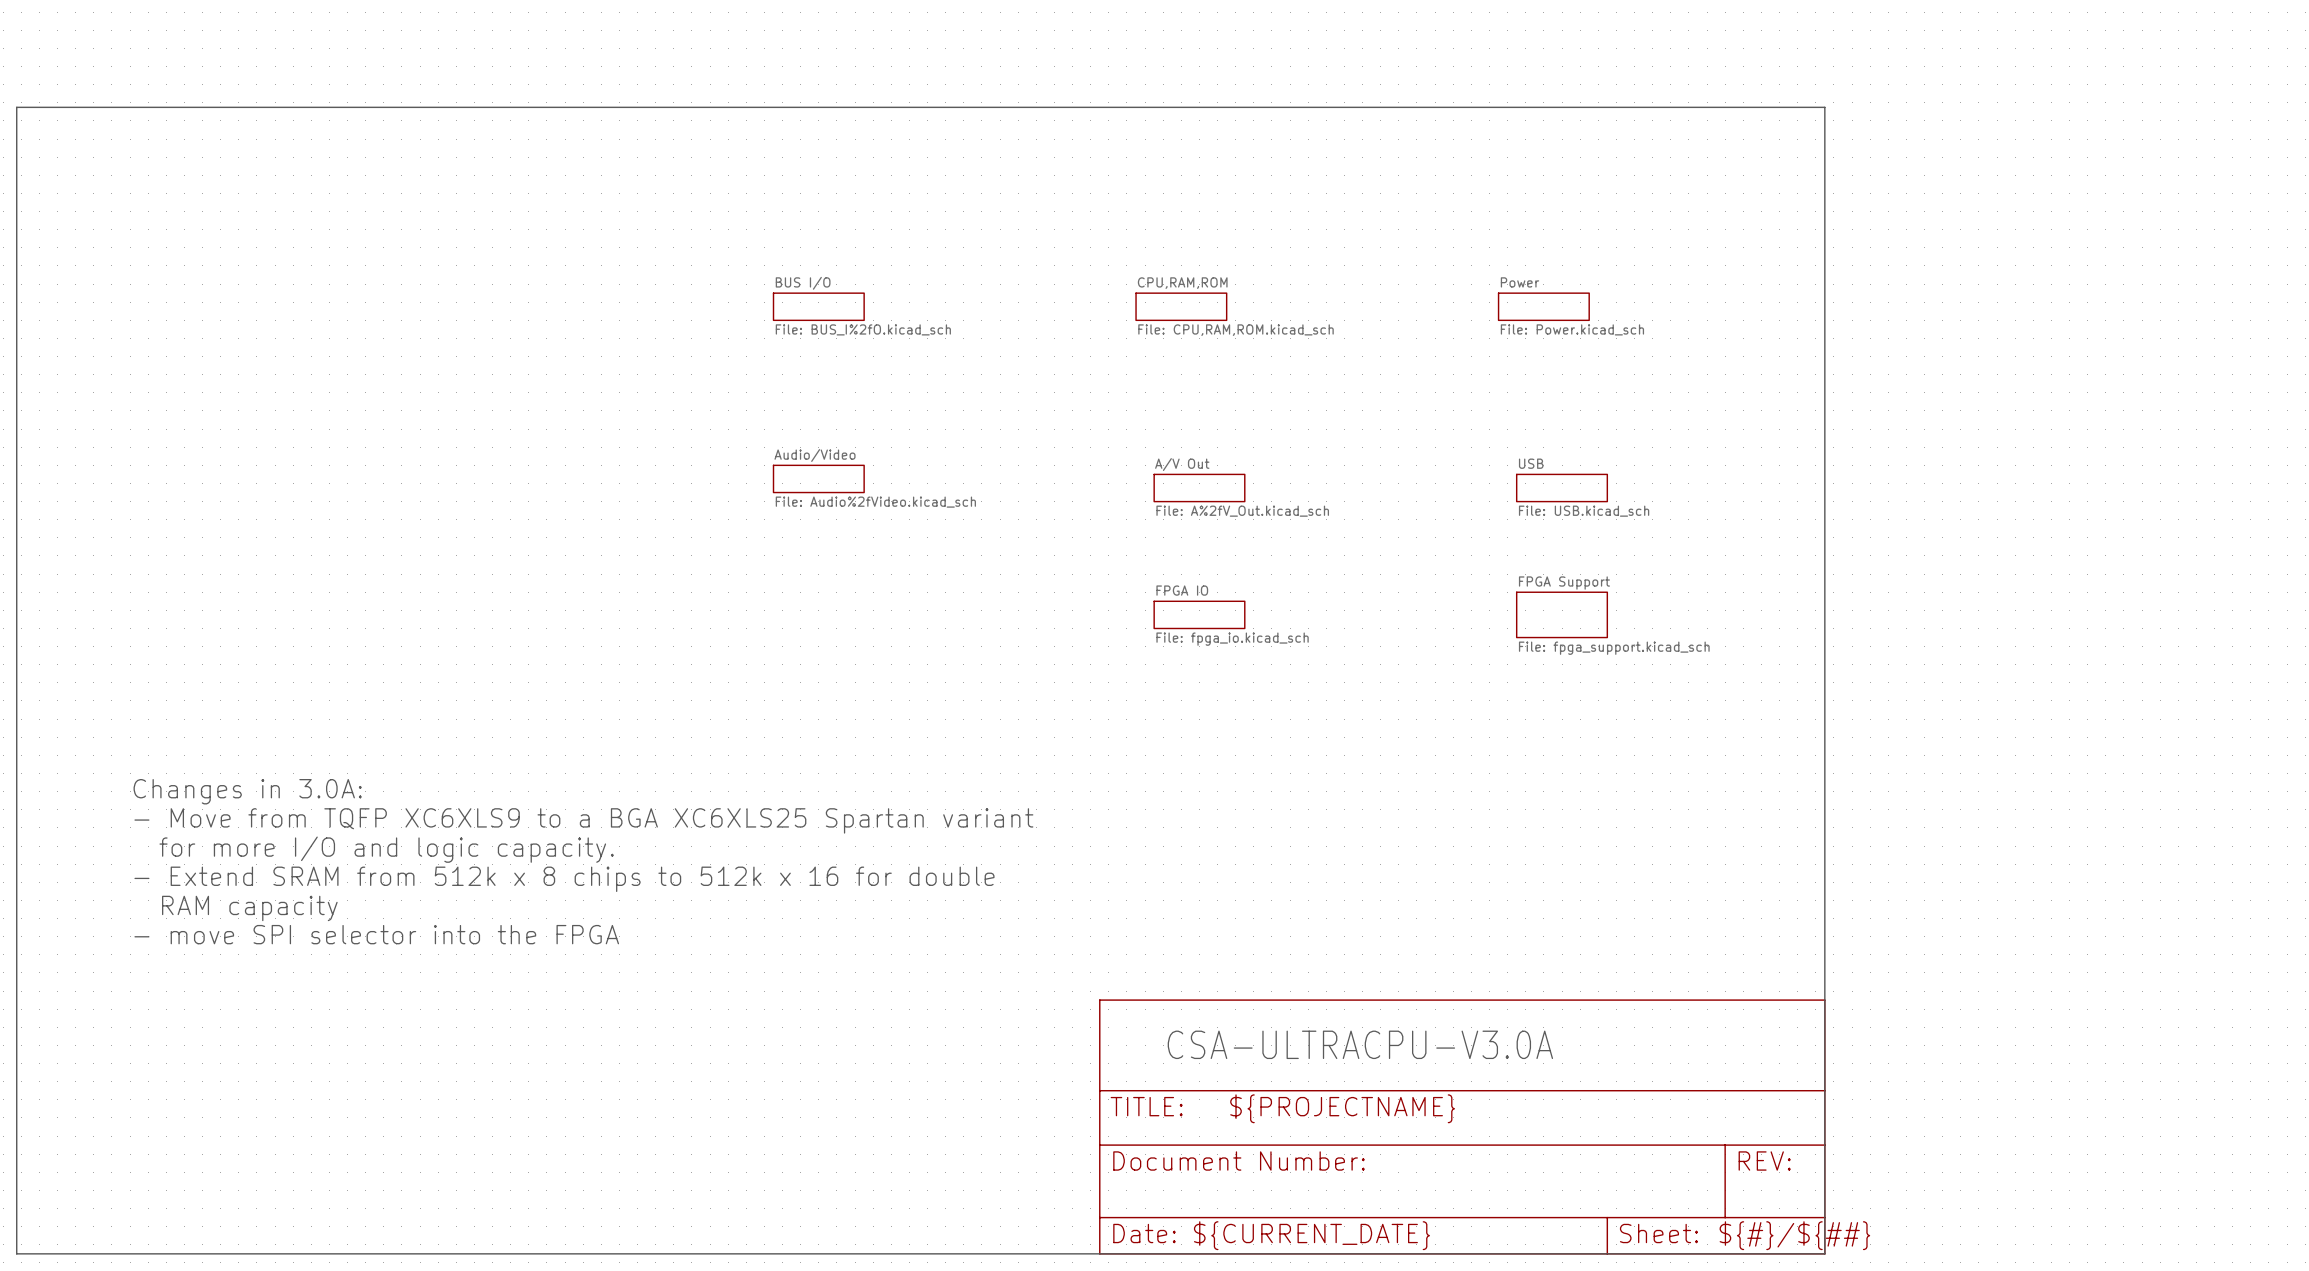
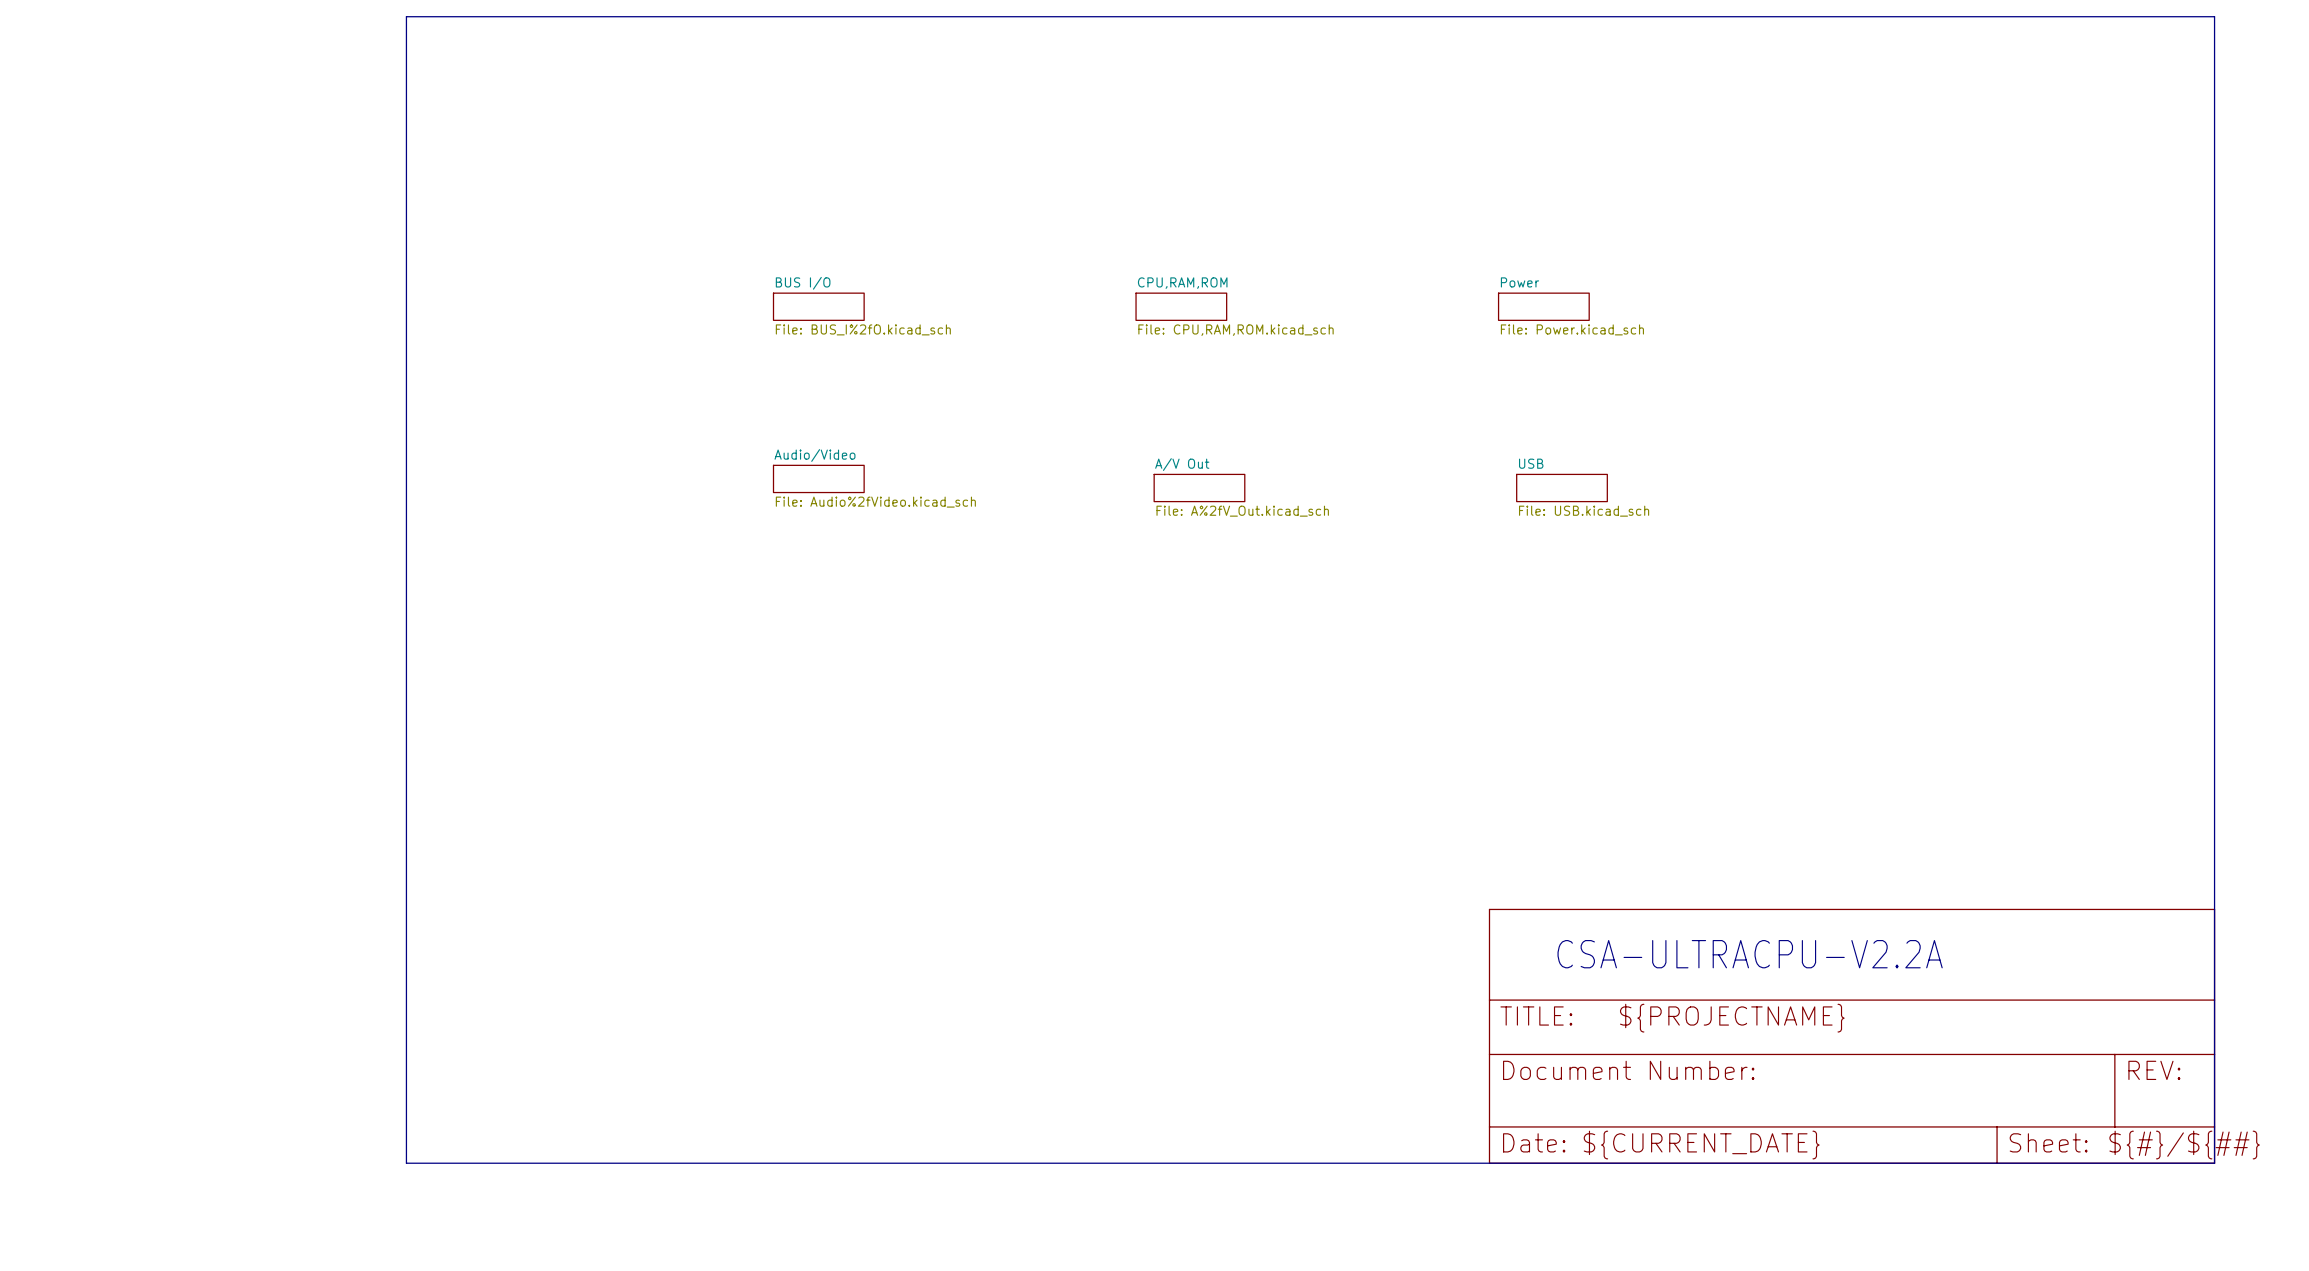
bus: (16, 107) (1824, 107) (1824, 1253) (16, 1253) (16, 107) -> (406, 16) (2214, 16) (2214, 1163) (406, 1163) (406, 16)
sheet FPGA IO: File: fpga_io.kicad_sch (1199, 614) -> none
sheet FPGA Support: File: fpga_support.kicad_sch (1562, 614) -> none
text: Changes in 3.0A: (247, 791) -> none
text: - Move from TQFP XC6XLS9 to a BGA XC6XLS25 Spartan variant (583, 820) -> none
text: for more I/O and logic capacity. (386, 849) -> none
text: - Extend SRAM from 512k x 8 chips to 512k x 16 for double (564, 879) -> none
text: RAM capacity (249, 908) -> none
text: - move SPI selector into the FPGA (376, 934) -> none
text: none -> CSA-ULTRACPU-V2.2A (1750, 954)
power symbol: none -> (1852, 1036)
text: CSA-ULTRACPU-V3.0A (1360, 1044) -> none
power symbol: (1462, 1126) -> none

